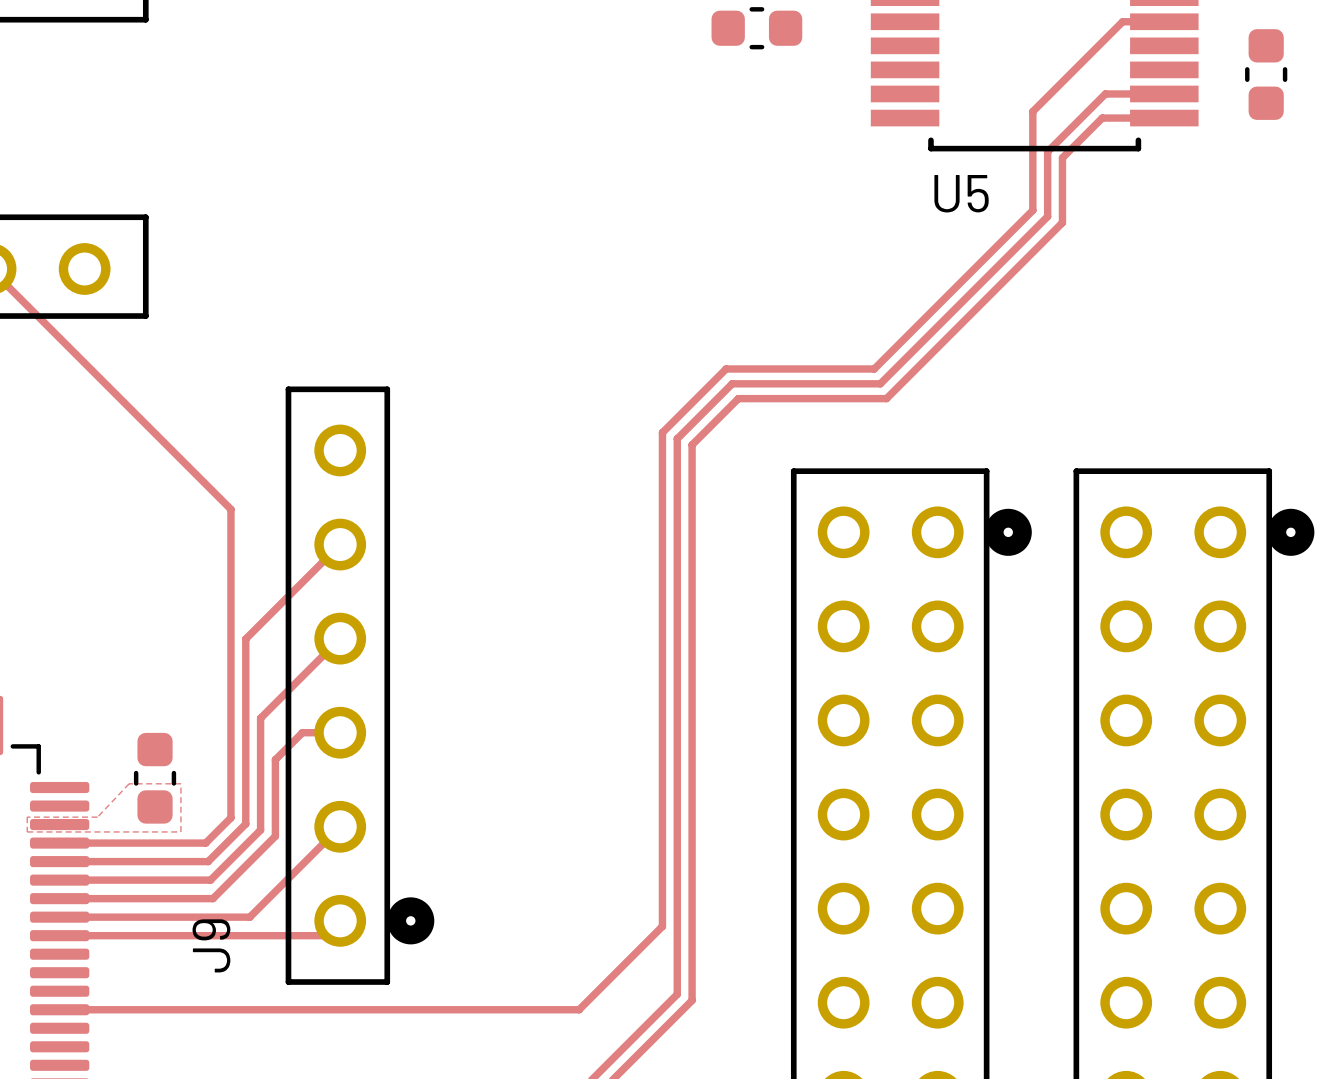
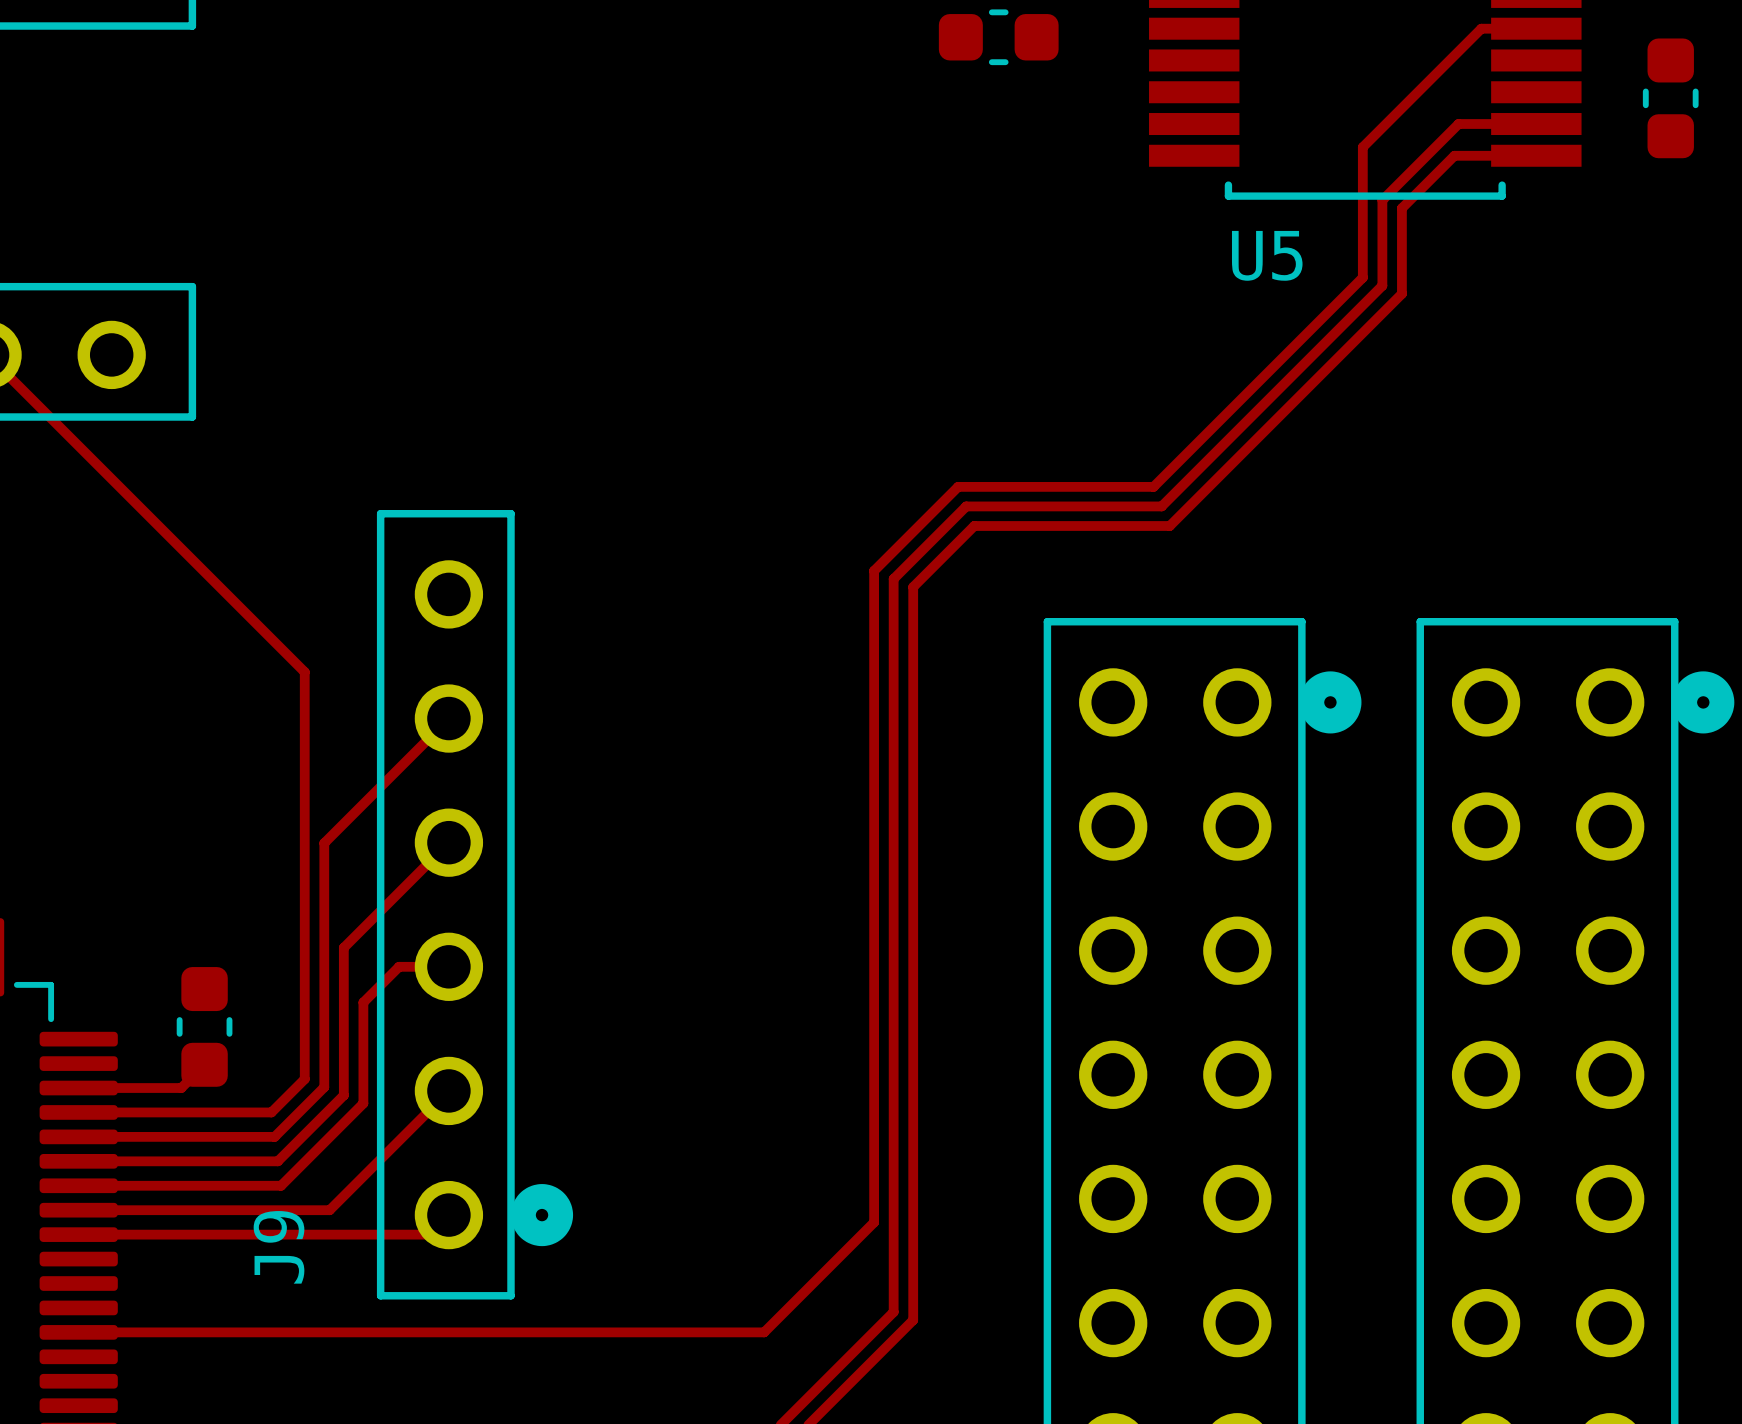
top zone outline: (129, 783) (180, 783) (180, 831) (27, 831) (27, 817) (97, 817) (129, 783) -> none
top track: none -> (204, 1064) (181, 1088) (78, 1088)

